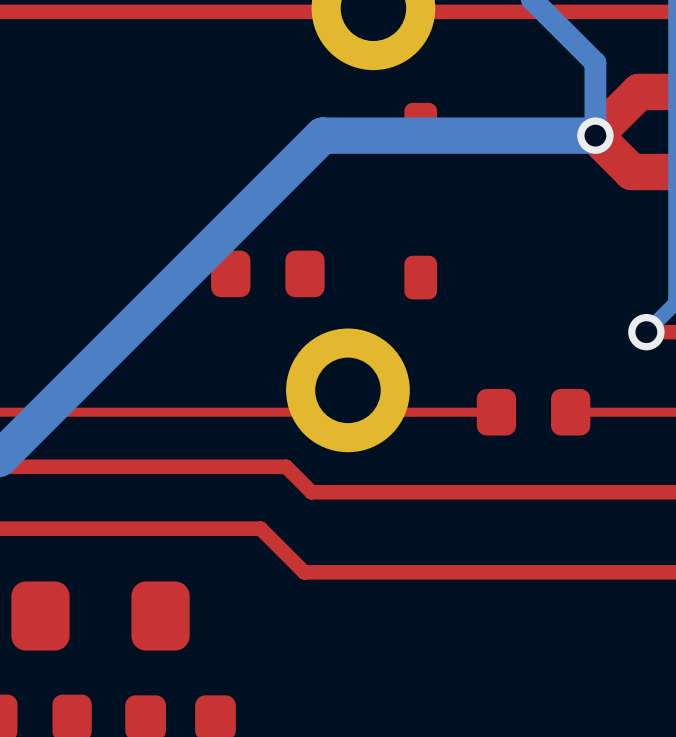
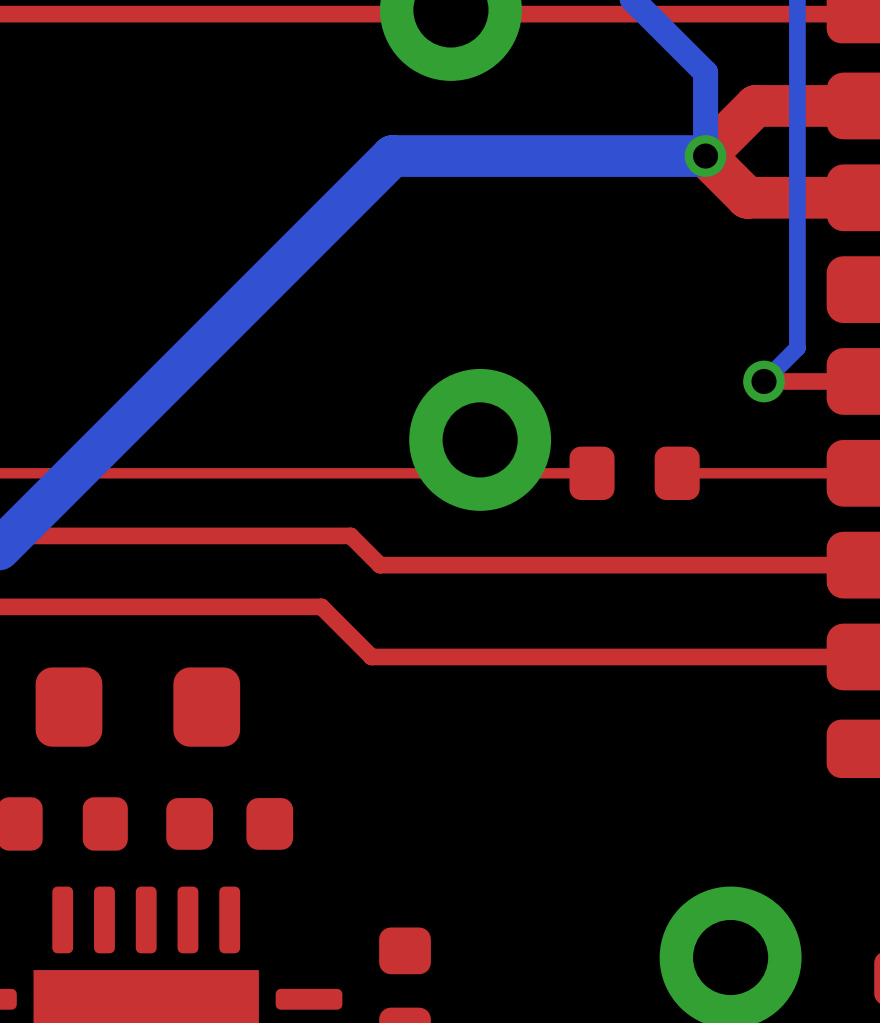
part: (420, 201) -> none
part: (267, 273) -> none
part position: (347, 390) -> (480, 439)

